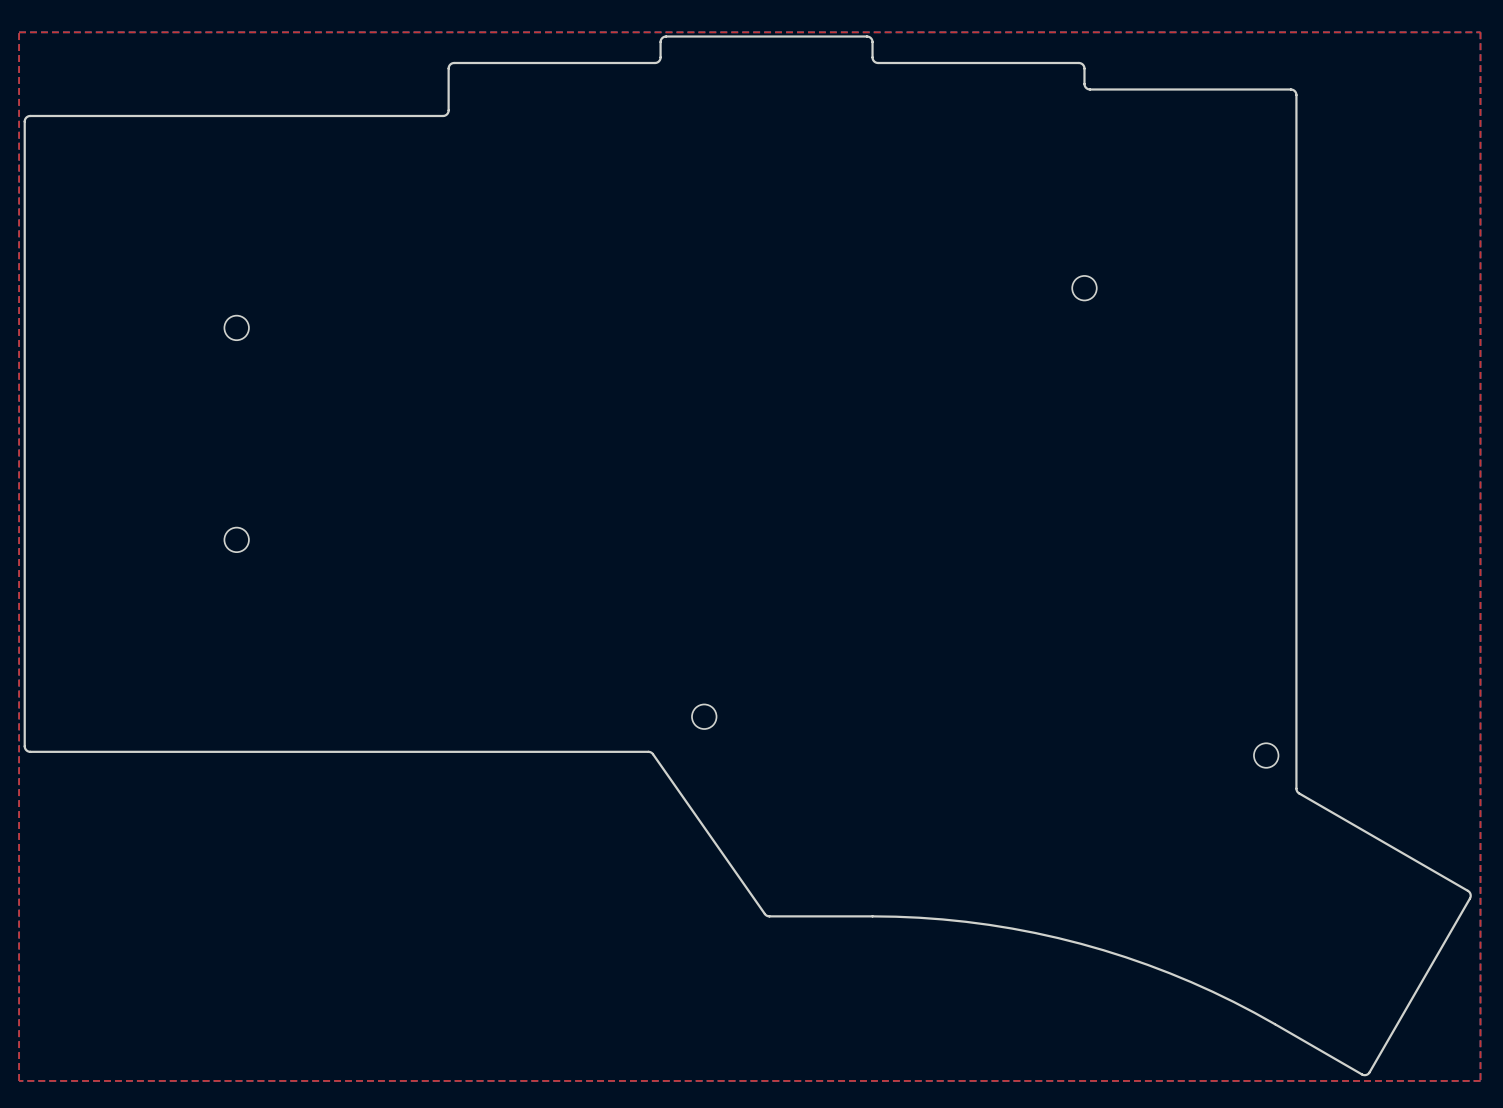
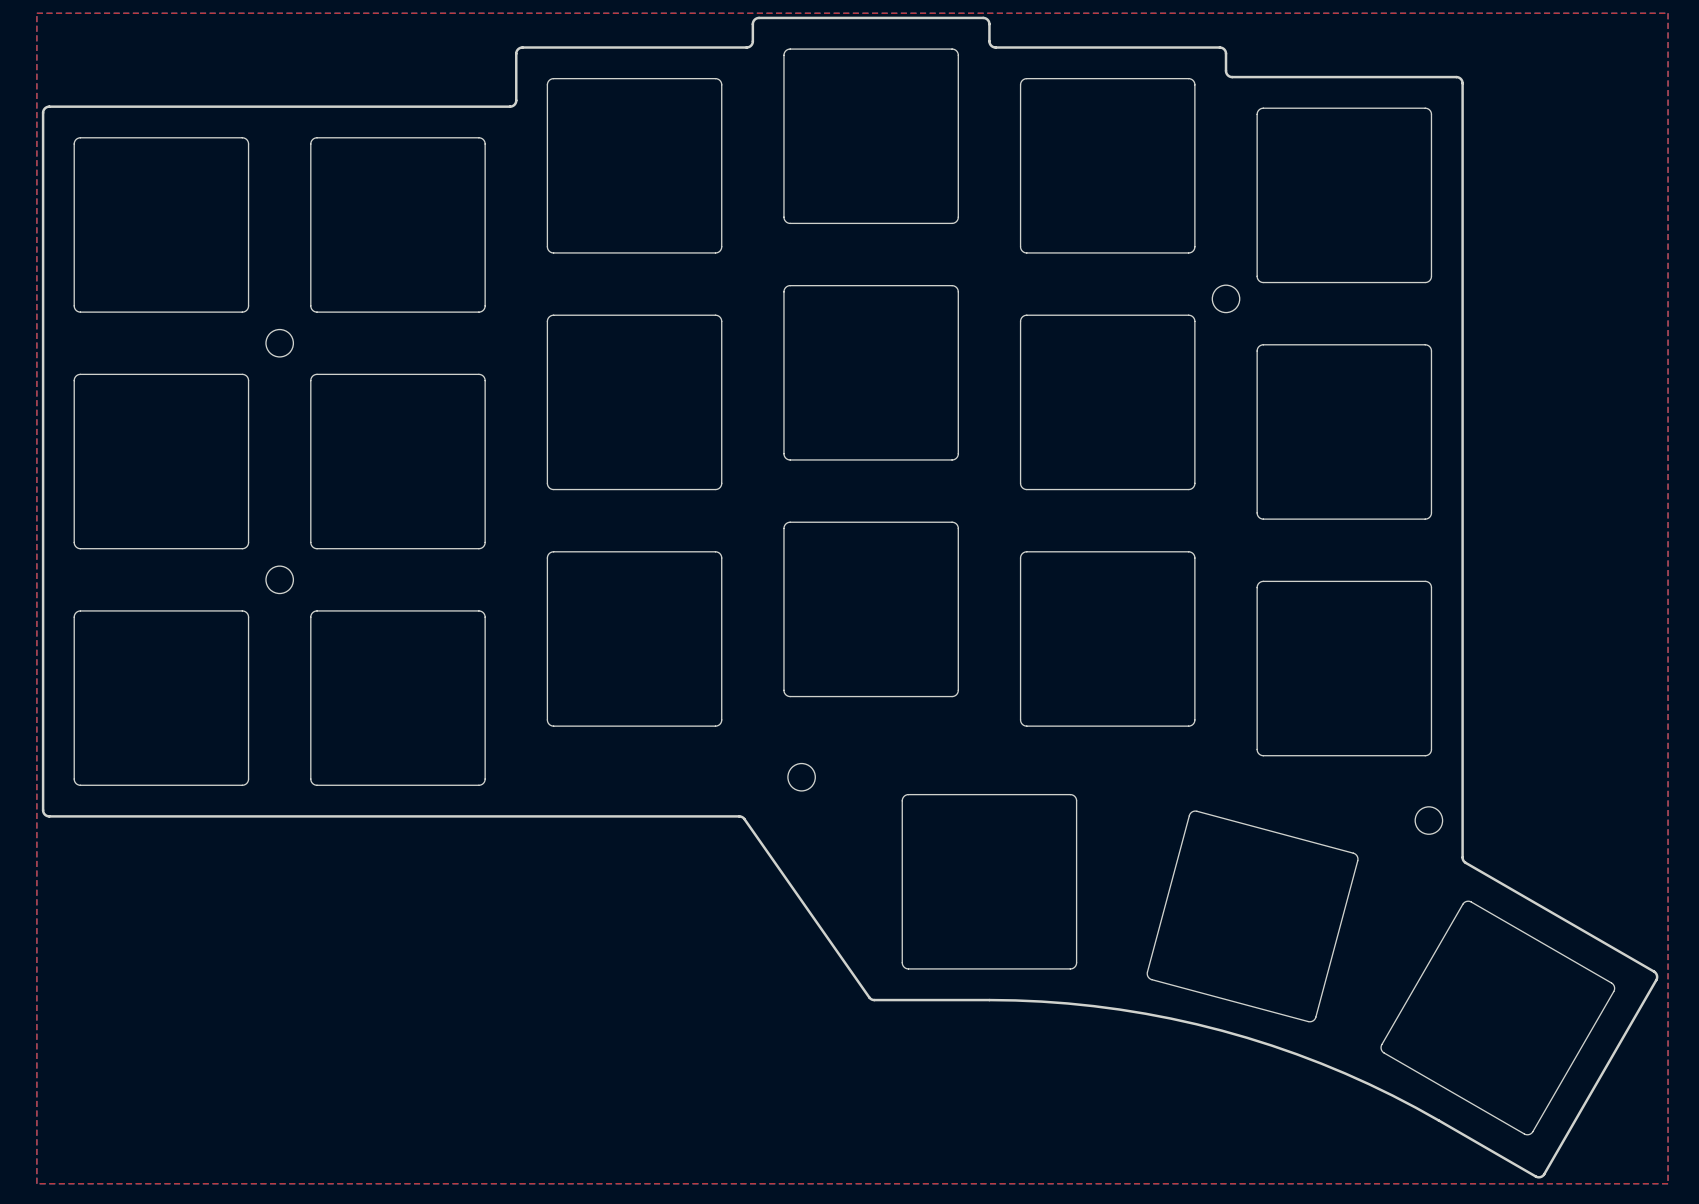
drawing: none -> [783, 48, 959, 224]
drawing: none -> [547, 78, 723, 254]
drawing: none -> [1020, 78, 1196, 254]
drawing: none -> [1256, 107, 1432, 283]
drawing: none -> [73, 137, 249, 313]
drawing: none -> [310, 137, 486, 313]
drawing: none -> [783, 285, 959, 461]
drawing: none -> [547, 314, 723, 490]
drawing: none -> [1020, 314, 1196, 490]
drawing: none -> [1256, 344, 1432, 520]
drawing: none -> [73, 374, 249, 550]
drawing: none -> [310, 374, 486, 550]
drawing: none -> [783, 521, 959, 697]
drawing: none -> [547, 551, 723, 727]
drawing: none -> [1020, 551, 1196, 727]
drawing: none -> [1256, 581, 1432, 757]
drawing: none -> [73, 610, 249, 786]
drawing: none -> [310, 610, 486, 786]
drawing: none -> [901, 794, 1077, 970]
drawing: none -> [1146, 810, 1359, 1023]
drawing: none -> [1380, 900, 1615, 1136]

